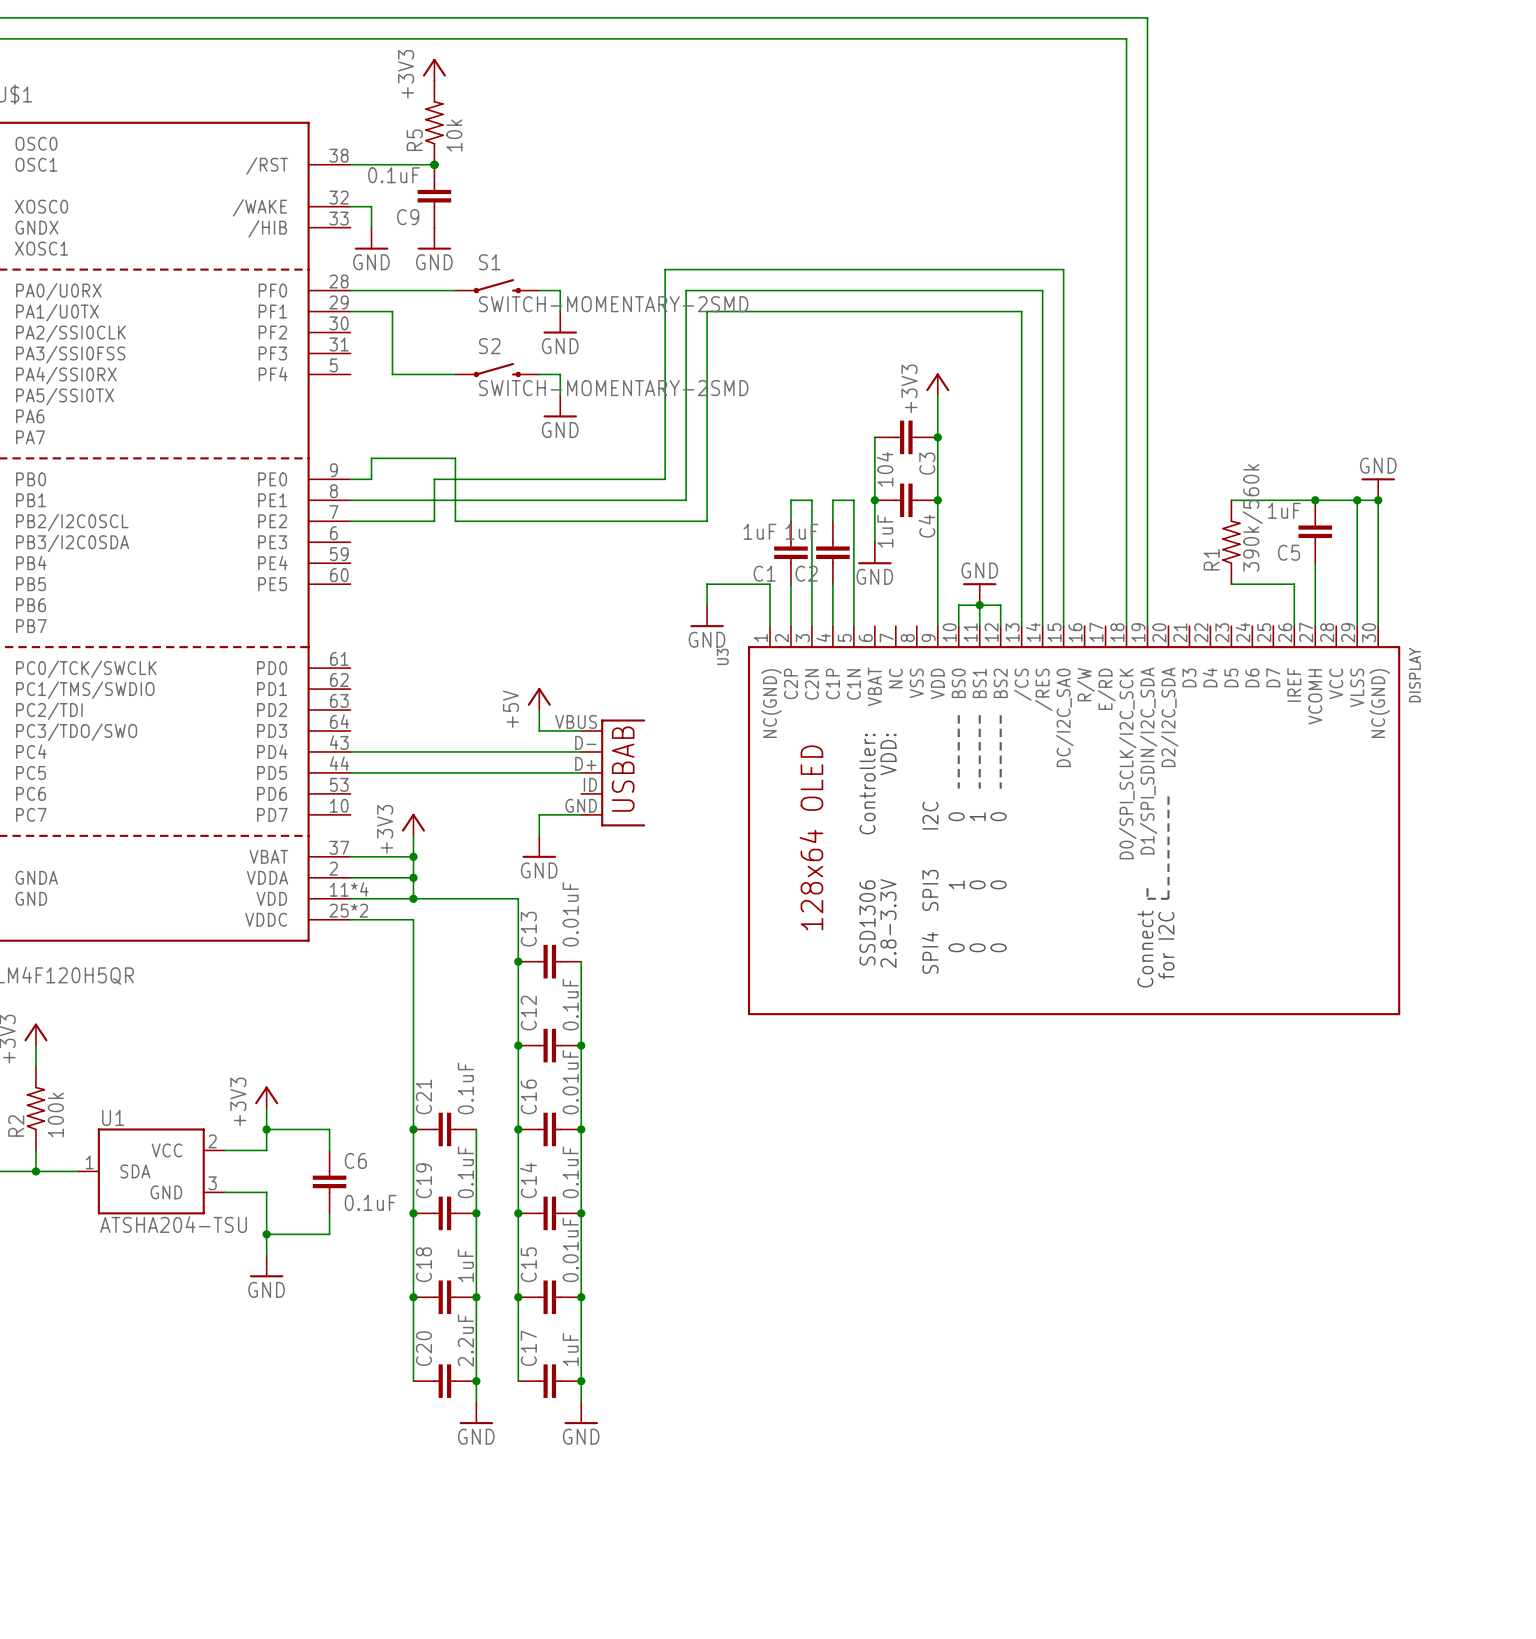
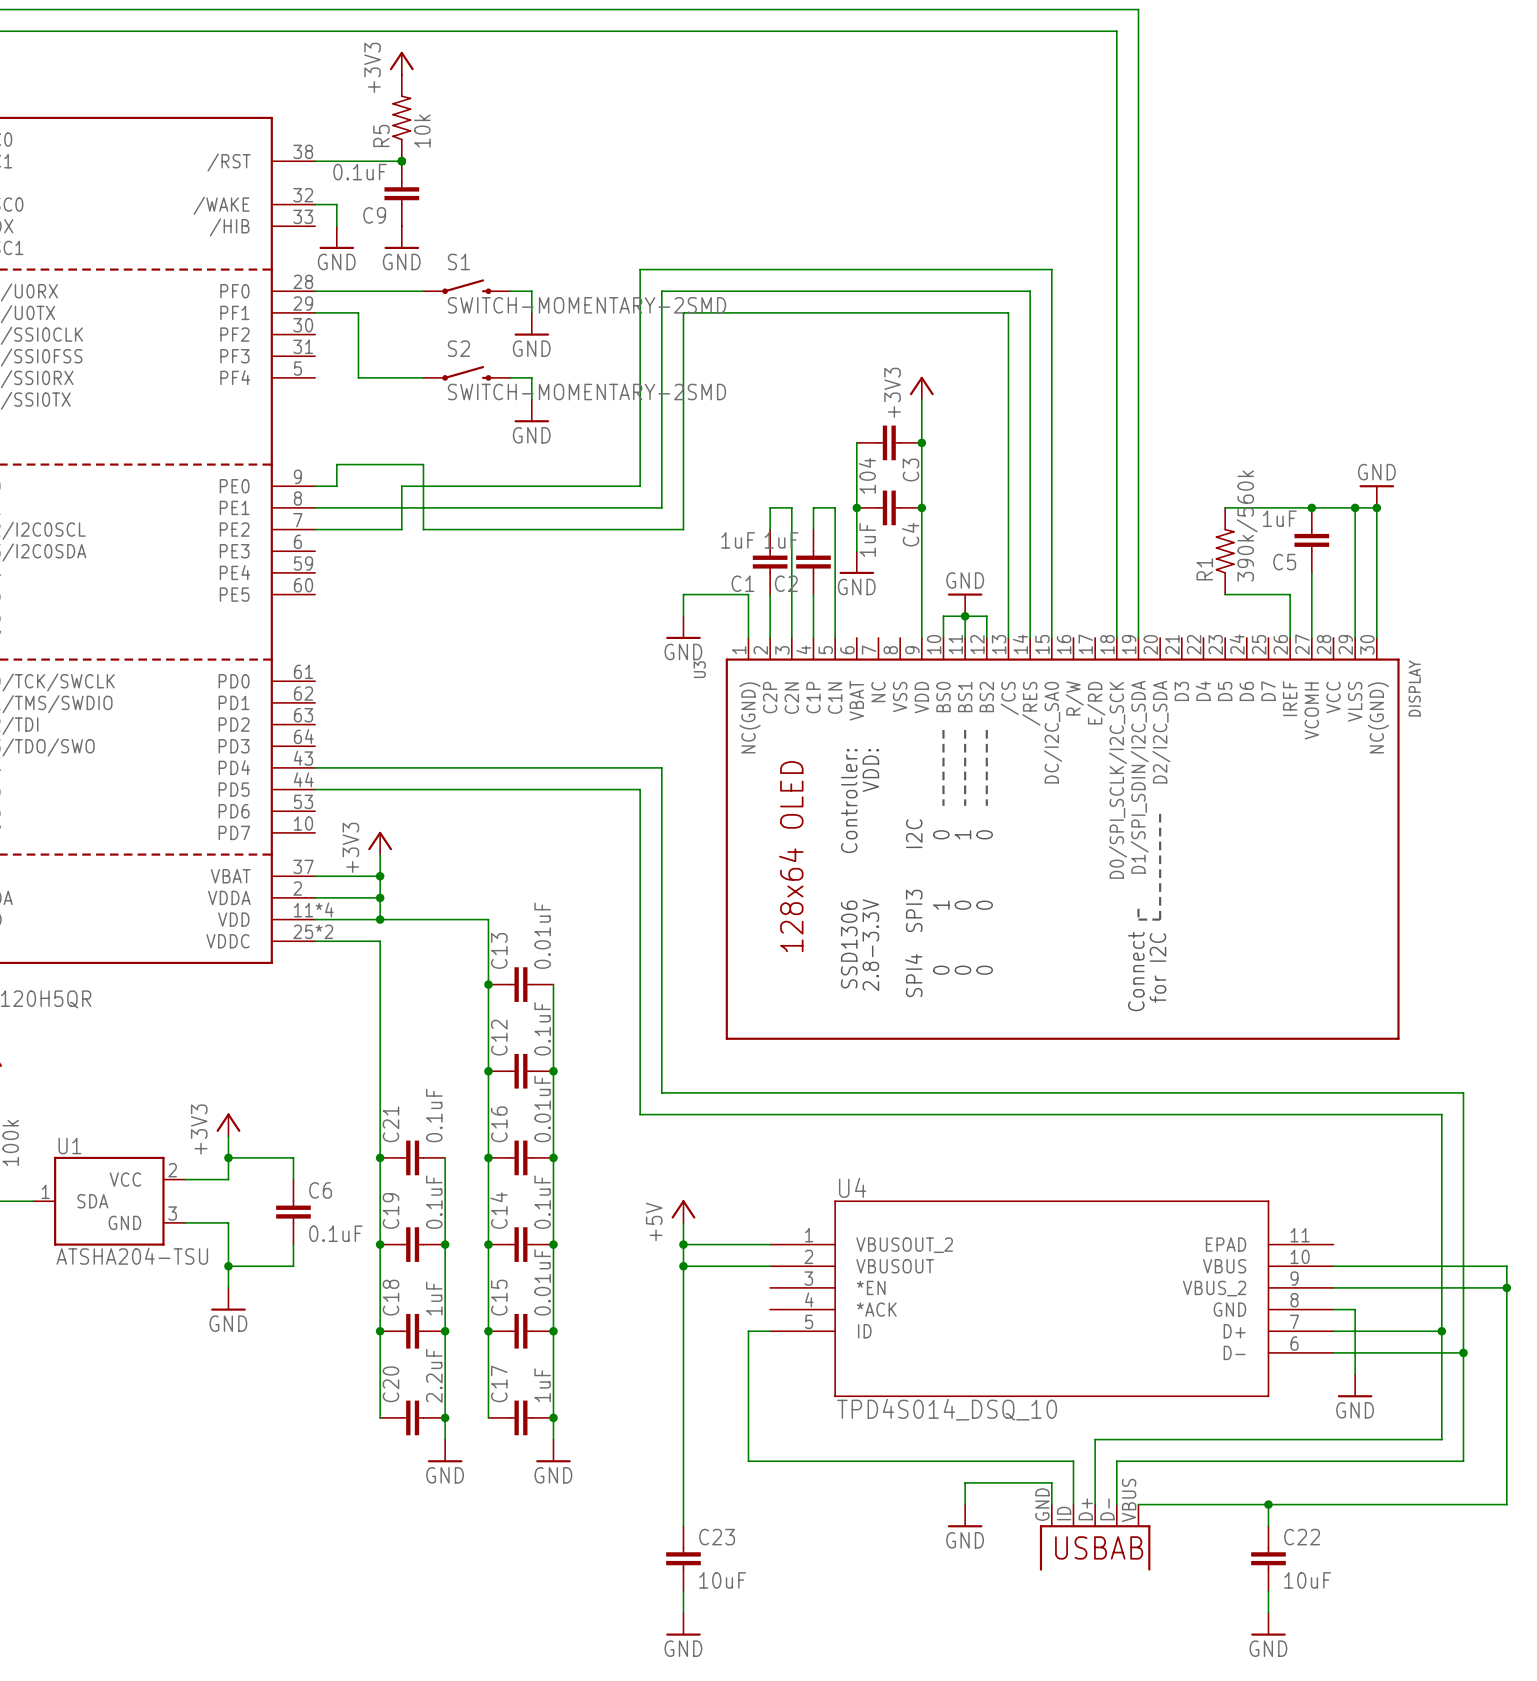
power symbol: +5V (539, 699) -> none
wire: (539, 710) (539, 731) (581, 731) -> none
wire: none -> (553, 767) (661, 767) (661, 1092) (1463, 1092) (1463, 1461) (1116, 1461) (1116, 1504)
wire: none -> (553, 789) (640, 789) (640, 1114) (1441, 1114) (1441, 1439) (1095, 1439) (1095, 1504)
part: (613, 772) -> none
wire: (581, 814) (539, 814) (539, 835) -> none
power symbol: GND (539, 846) -> none
power symbol: none -> +5V (683, 1211)
wire: none -> (683, 1222) (683, 1526)
wire: none -> (683, 1244) (770, 1244)
junction: none -> (683, 1244)
wire: none -> (683, 1266) (770, 1266)
junction: none -> (683, 1266)
wire: none -> (1333, 1266) (1506, 1266) (1506, 1504) (1138, 1504)
wire: none -> (1333, 1287) (1506, 1287)
junction: none -> (1506, 1287)
U4: none -> TPD4S014_DSQ_10 (1051, 1298)
wire: none -> (1333, 1309) (1355, 1309) (1355, 1374)
wire: none -> (770, 1331) (748, 1331) (748, 1461) (1073, 1461) (1073, 1504)
wire: none -> (1333, 1331) (1441, 1331)
junction: none -> (1441, 1331)
wire: none -> (1333, 1352) (1463, 1352)
junction: none -> (1463, 1352)
power symbol: none -> GND (1355, 1385)
wire: none -> (965, 1504) (965, 1482) (1051, 1482) (1051, 1504)
wire: none -> (1268, 1504) (1268, 1526)
junction: none -> (1268, 1504)
power symbol: none -> GND (965, 1515)
part: none -> (1095, 1537)
C23: none -> 10uF (683, 1558)
C22: none -> 10uF (1268, 1558)
wire: none -> (683, 1591) (683, 1612)
wire: none -> (1268, 1591) (1268, 1612)
power symbol: none -> GND (683, 1624)
power symbol: none -> GND (1268, 1624)

